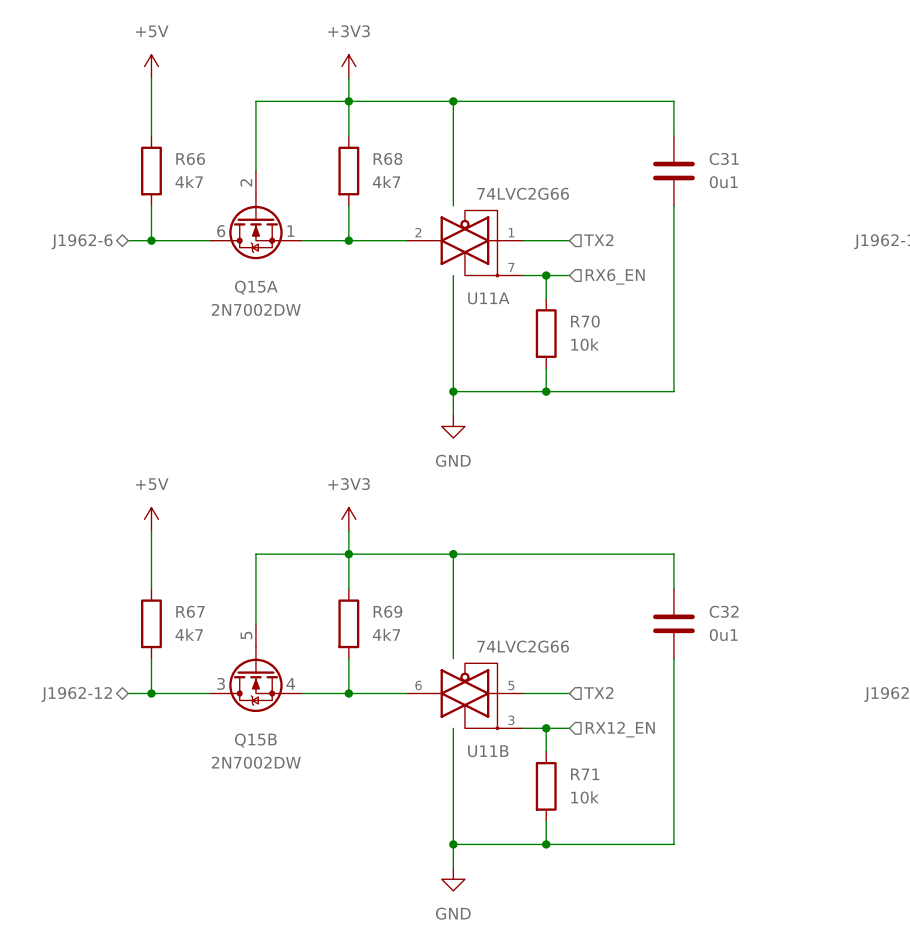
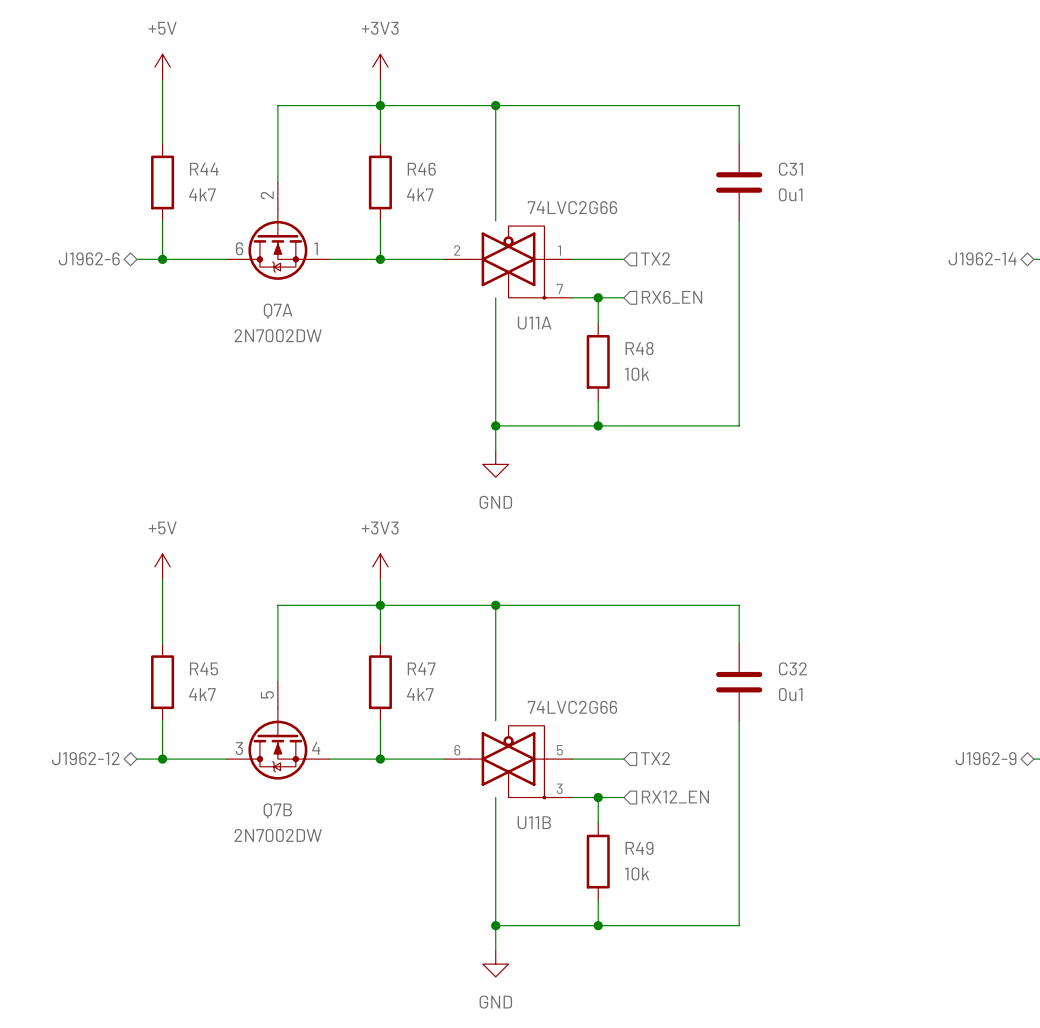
R66 name: R66 (190, 158) -> R44 (204, 169)
R68 name: R68 (387, 158) -> R46 (421, 169)
Q15A name: Q15A (256, 287) -> Q7A (278, 311)
R70 name: R70 (585, 321) -> R48 (639, 348)
R67 name: R67 (190, 611) -> R45 (203, 668)
R69 name: R69 (387, 611) -> R47 (421, 668)
Q15B name: Q15B (255, 740) -> Q7B (277, 810)
R71 name: R71 (585, 774) -> R49 (639, 848)

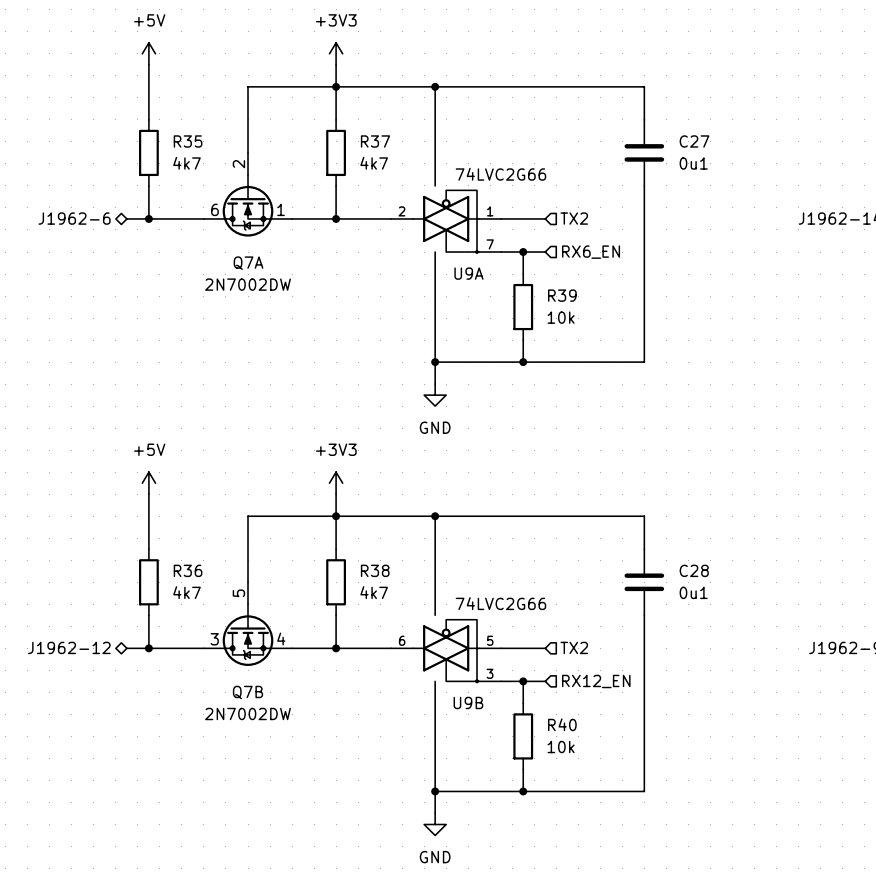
R44 name: R44 (204, 169) -> R35 (188, 141)
R46 name: R46 (421, 169) -> R37 (375, 141)
C31 name: C31 (790, 169) -> C27 (694, 141)
U11A name: U11A (534, 323) -> U9A (468, 273)
R48 name: R48 (639, 348) -> R39 (562, 295)
R45 name: R45 (203, 668) -> R36 (188, 570)
R47 name: R47 (421, 668) -> R38 (375, 570)
C32 name: C32 (792, 668) -> C28 (694, 570)
U11B name: U11B (534, 822) -> U9B (468, 702)
R49 name: R49 (639, 848) -> R40 (562, 724)

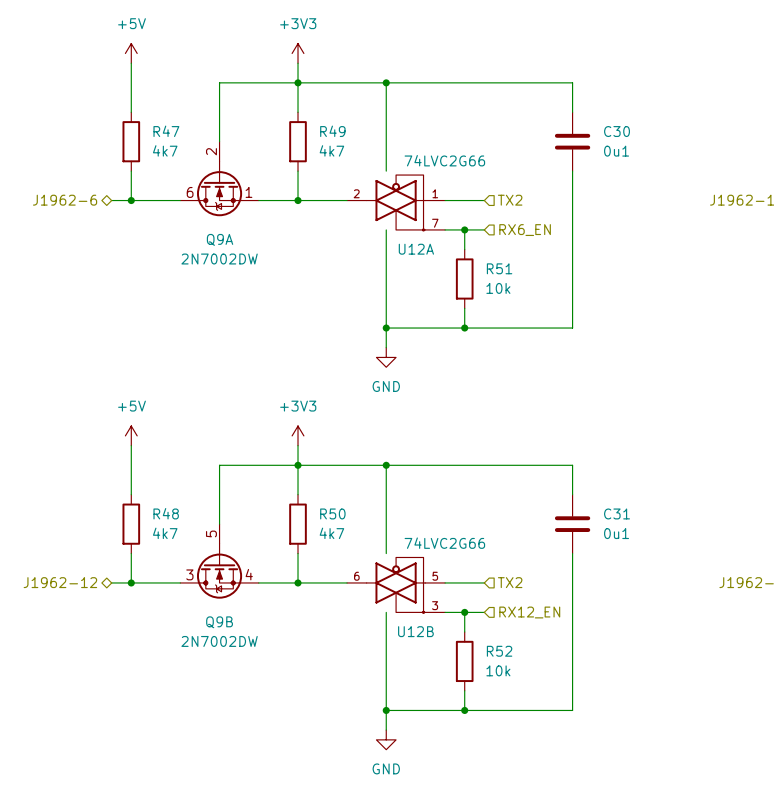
R35 name: R35 (188, 141) -> R47 (166, 131)
R37 name: R37 (375, 141) -> R49 (332, 131)
C27 name: C27 (694, 141) -> C30 (617, 131)
Q7A name: Q7A (248, 263) -> Q9A (220, 239)
U9A name: U9A (468, 273) -> U12A (416, 249)
R39 name: R39 (562, 295) -> R51 (499, 268)
R36 name: R36 (188, 570) -> R48 (166, 513)
R38 name: R38 (375, 570) -> R50 (332, 513)
C28 name: C28 (694, 570) -> C31 (617, 513)
Q7B name: Q7B (248, 692) -> Q9B (219, 622)
U9B name: U9B (468, 702) -> U12B (415, 631)
R40 name: R40 (562, 724) -> R52 (499, 651)

